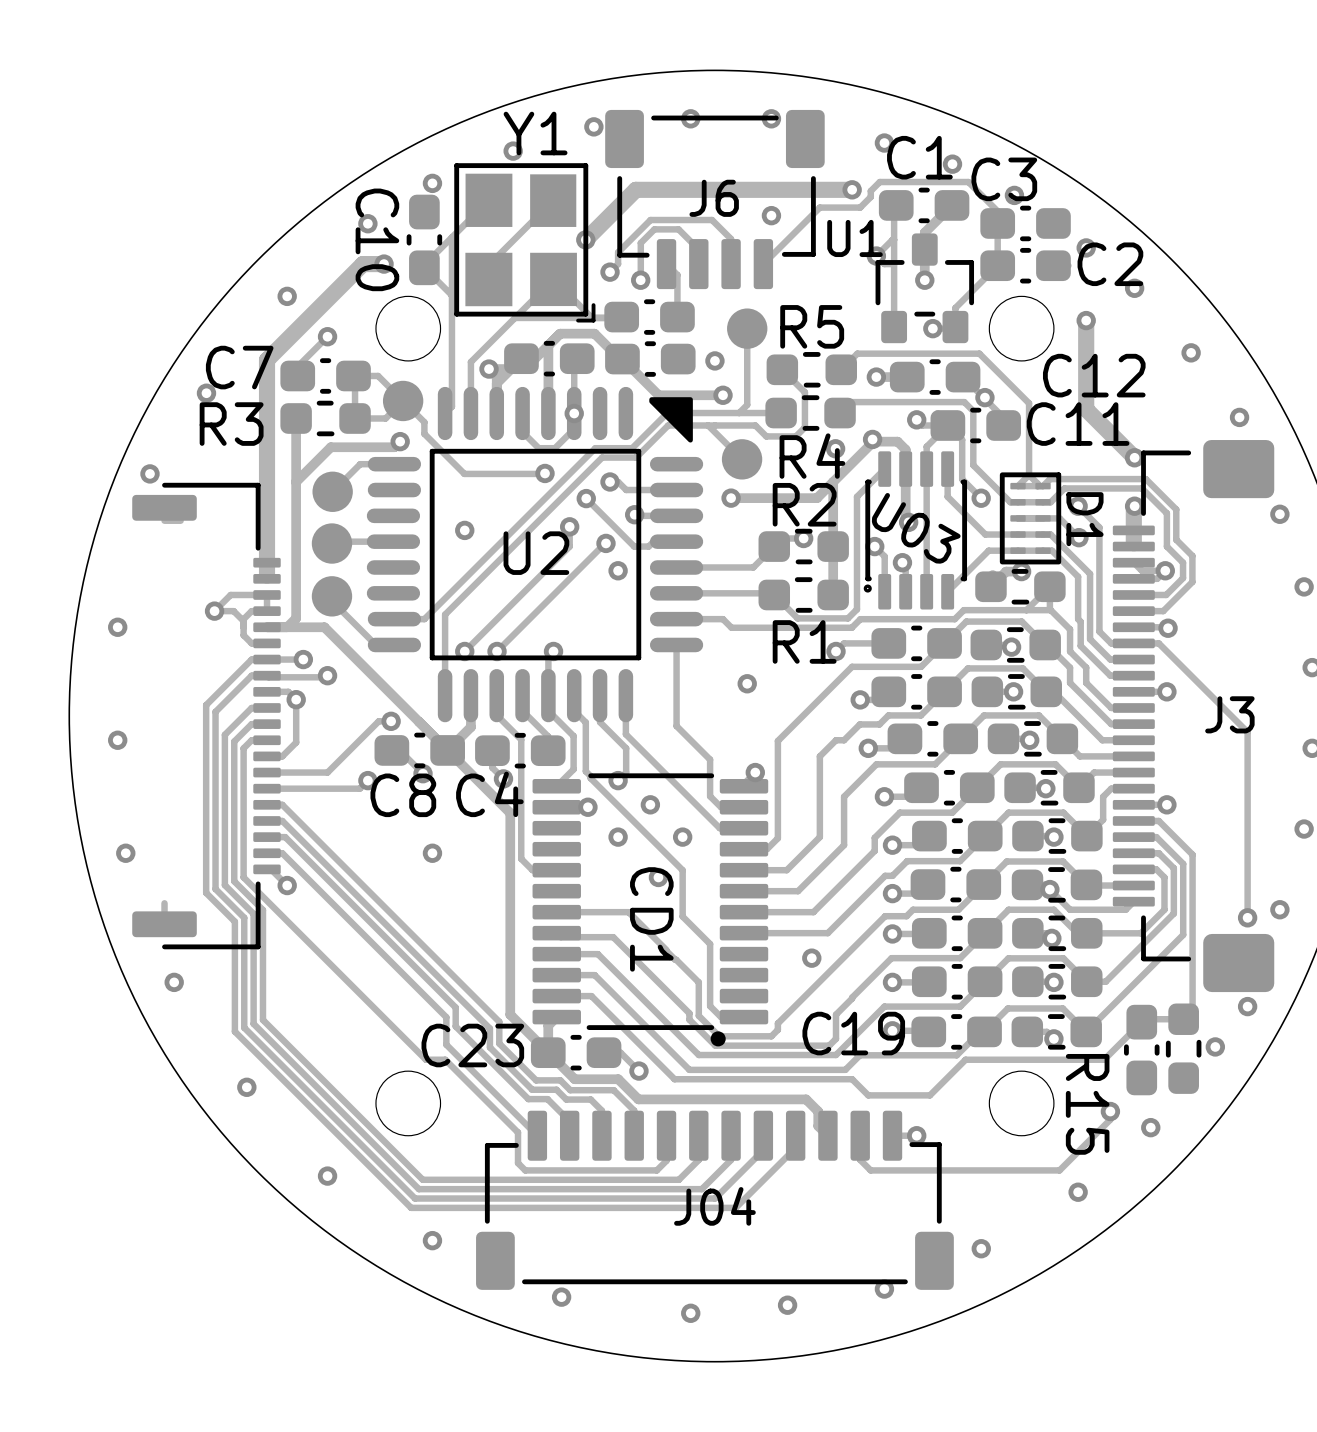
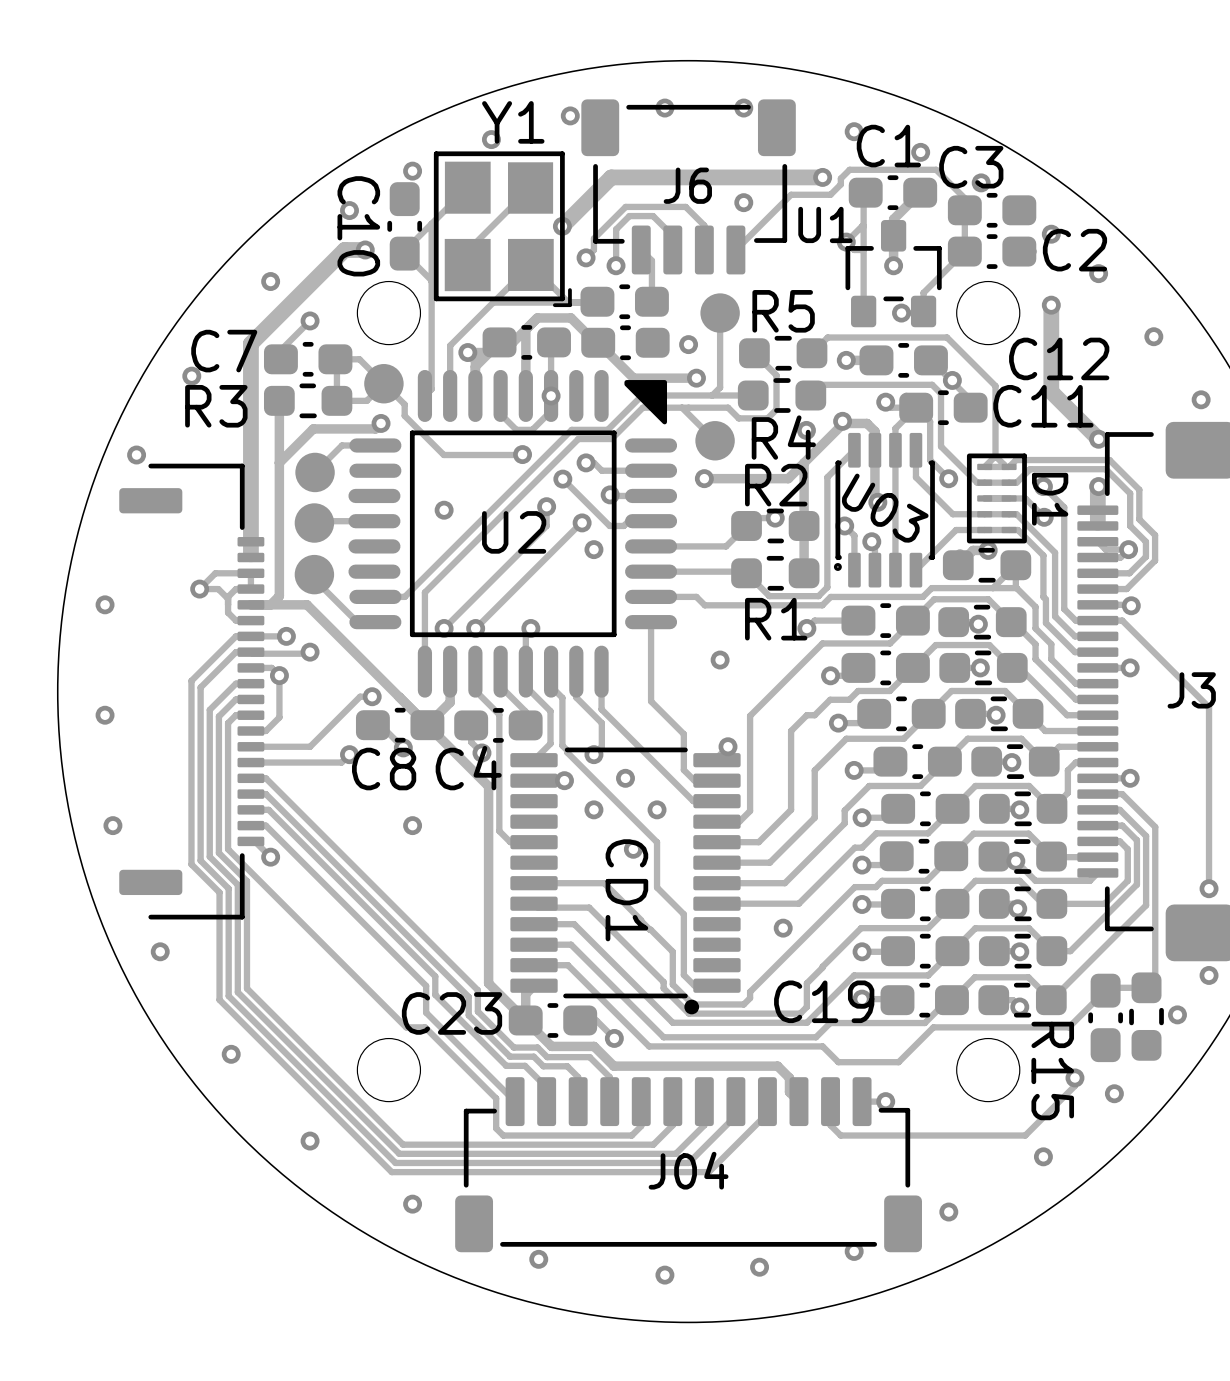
part footprint: [132, 482, 281, 950] -> [119, 463, 265, 920]

